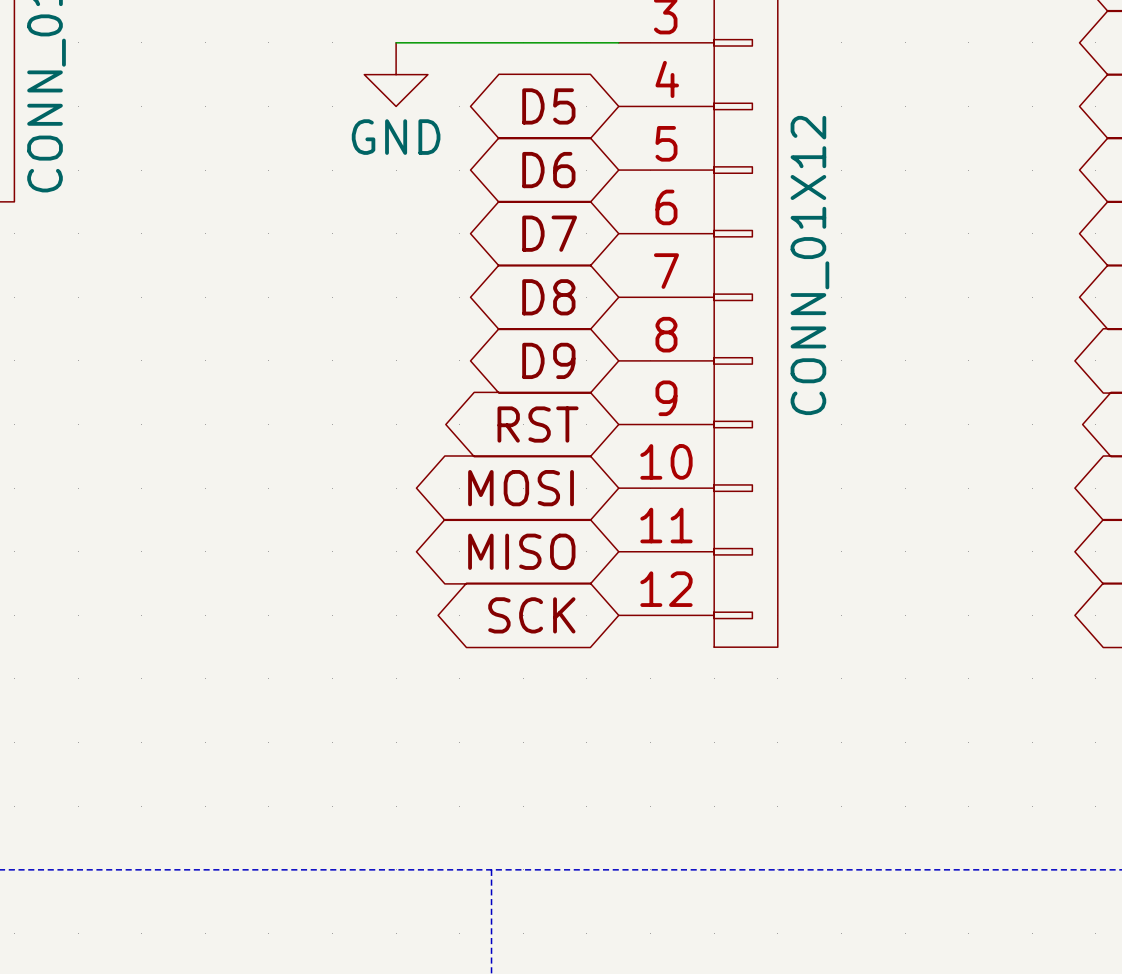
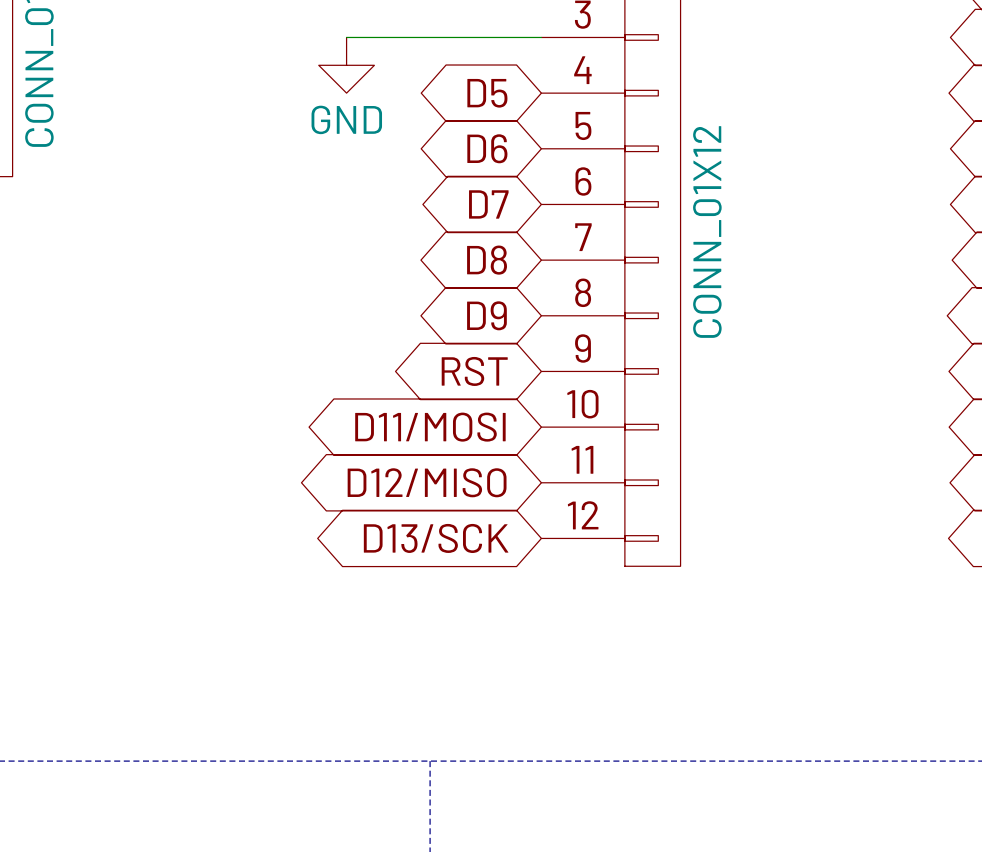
global label: MOSI (521, 488) -> D11/MOSI (430, 427)
global label: MISO (521, 551) -> D12/MISO (427, 482)
global label: SCK (531, 615) -> D13/SCK (436, 538)

